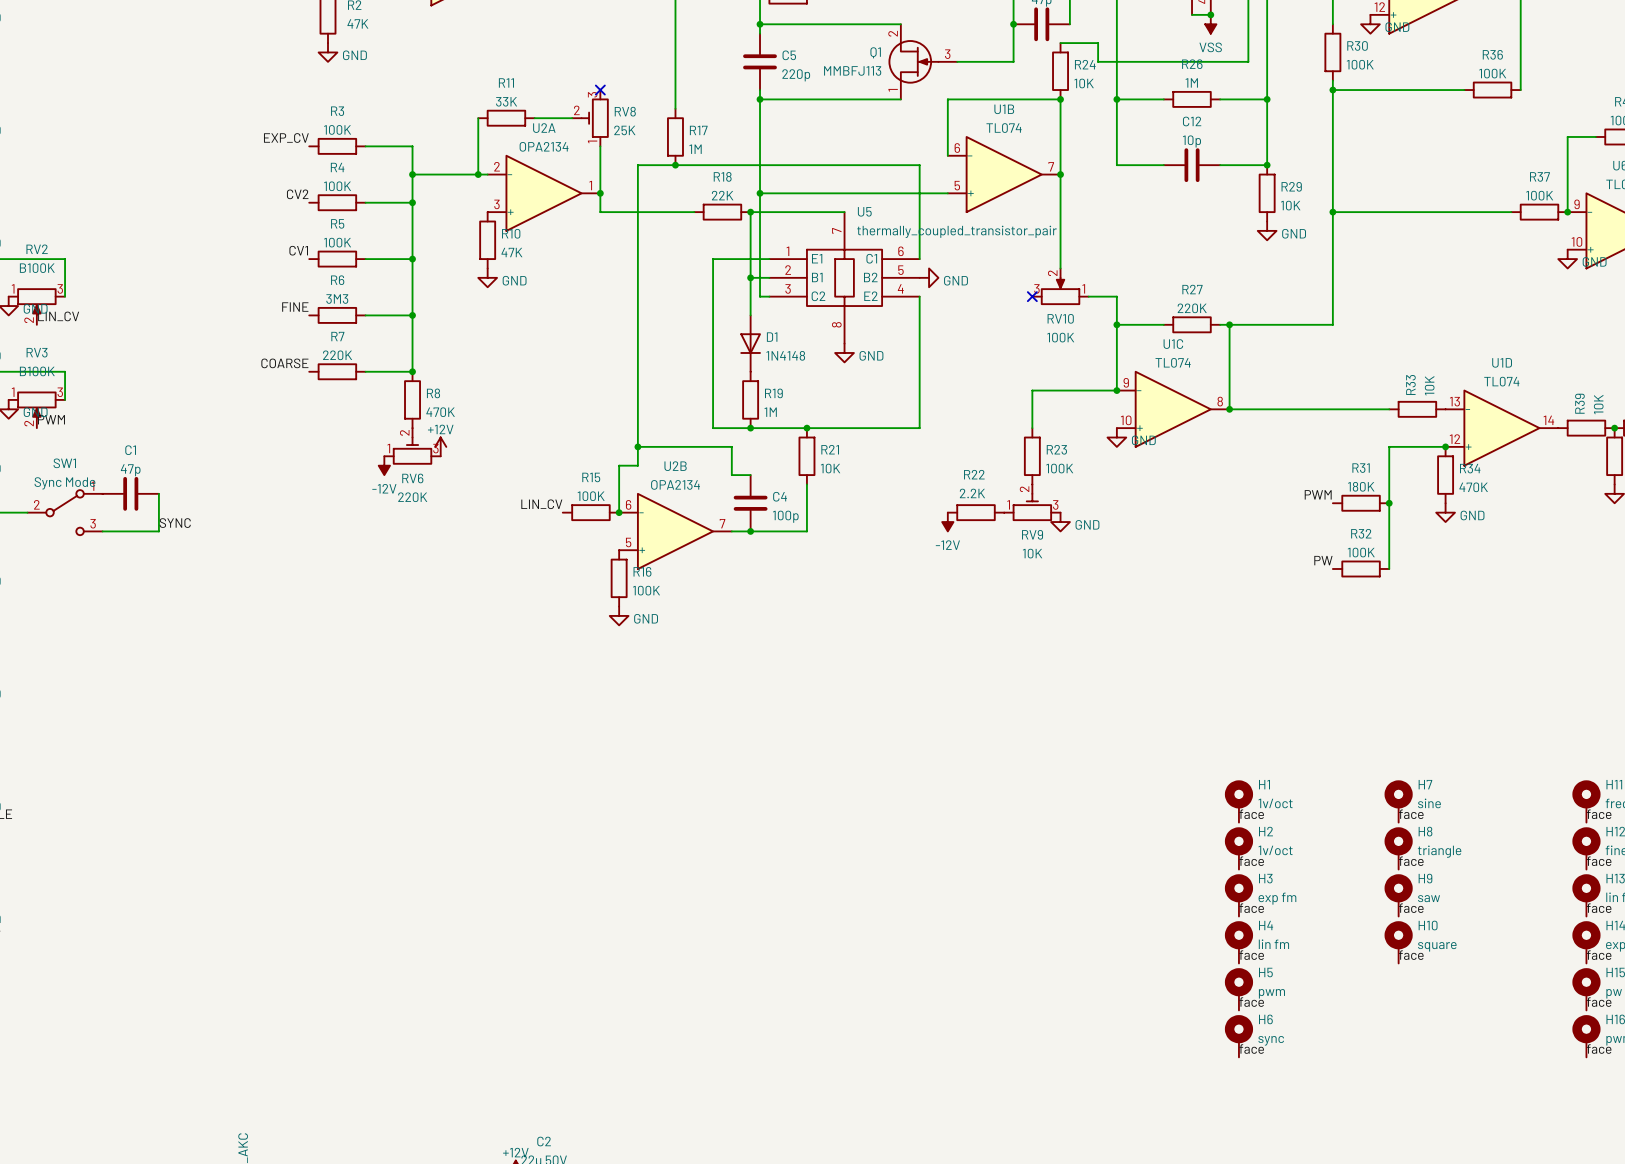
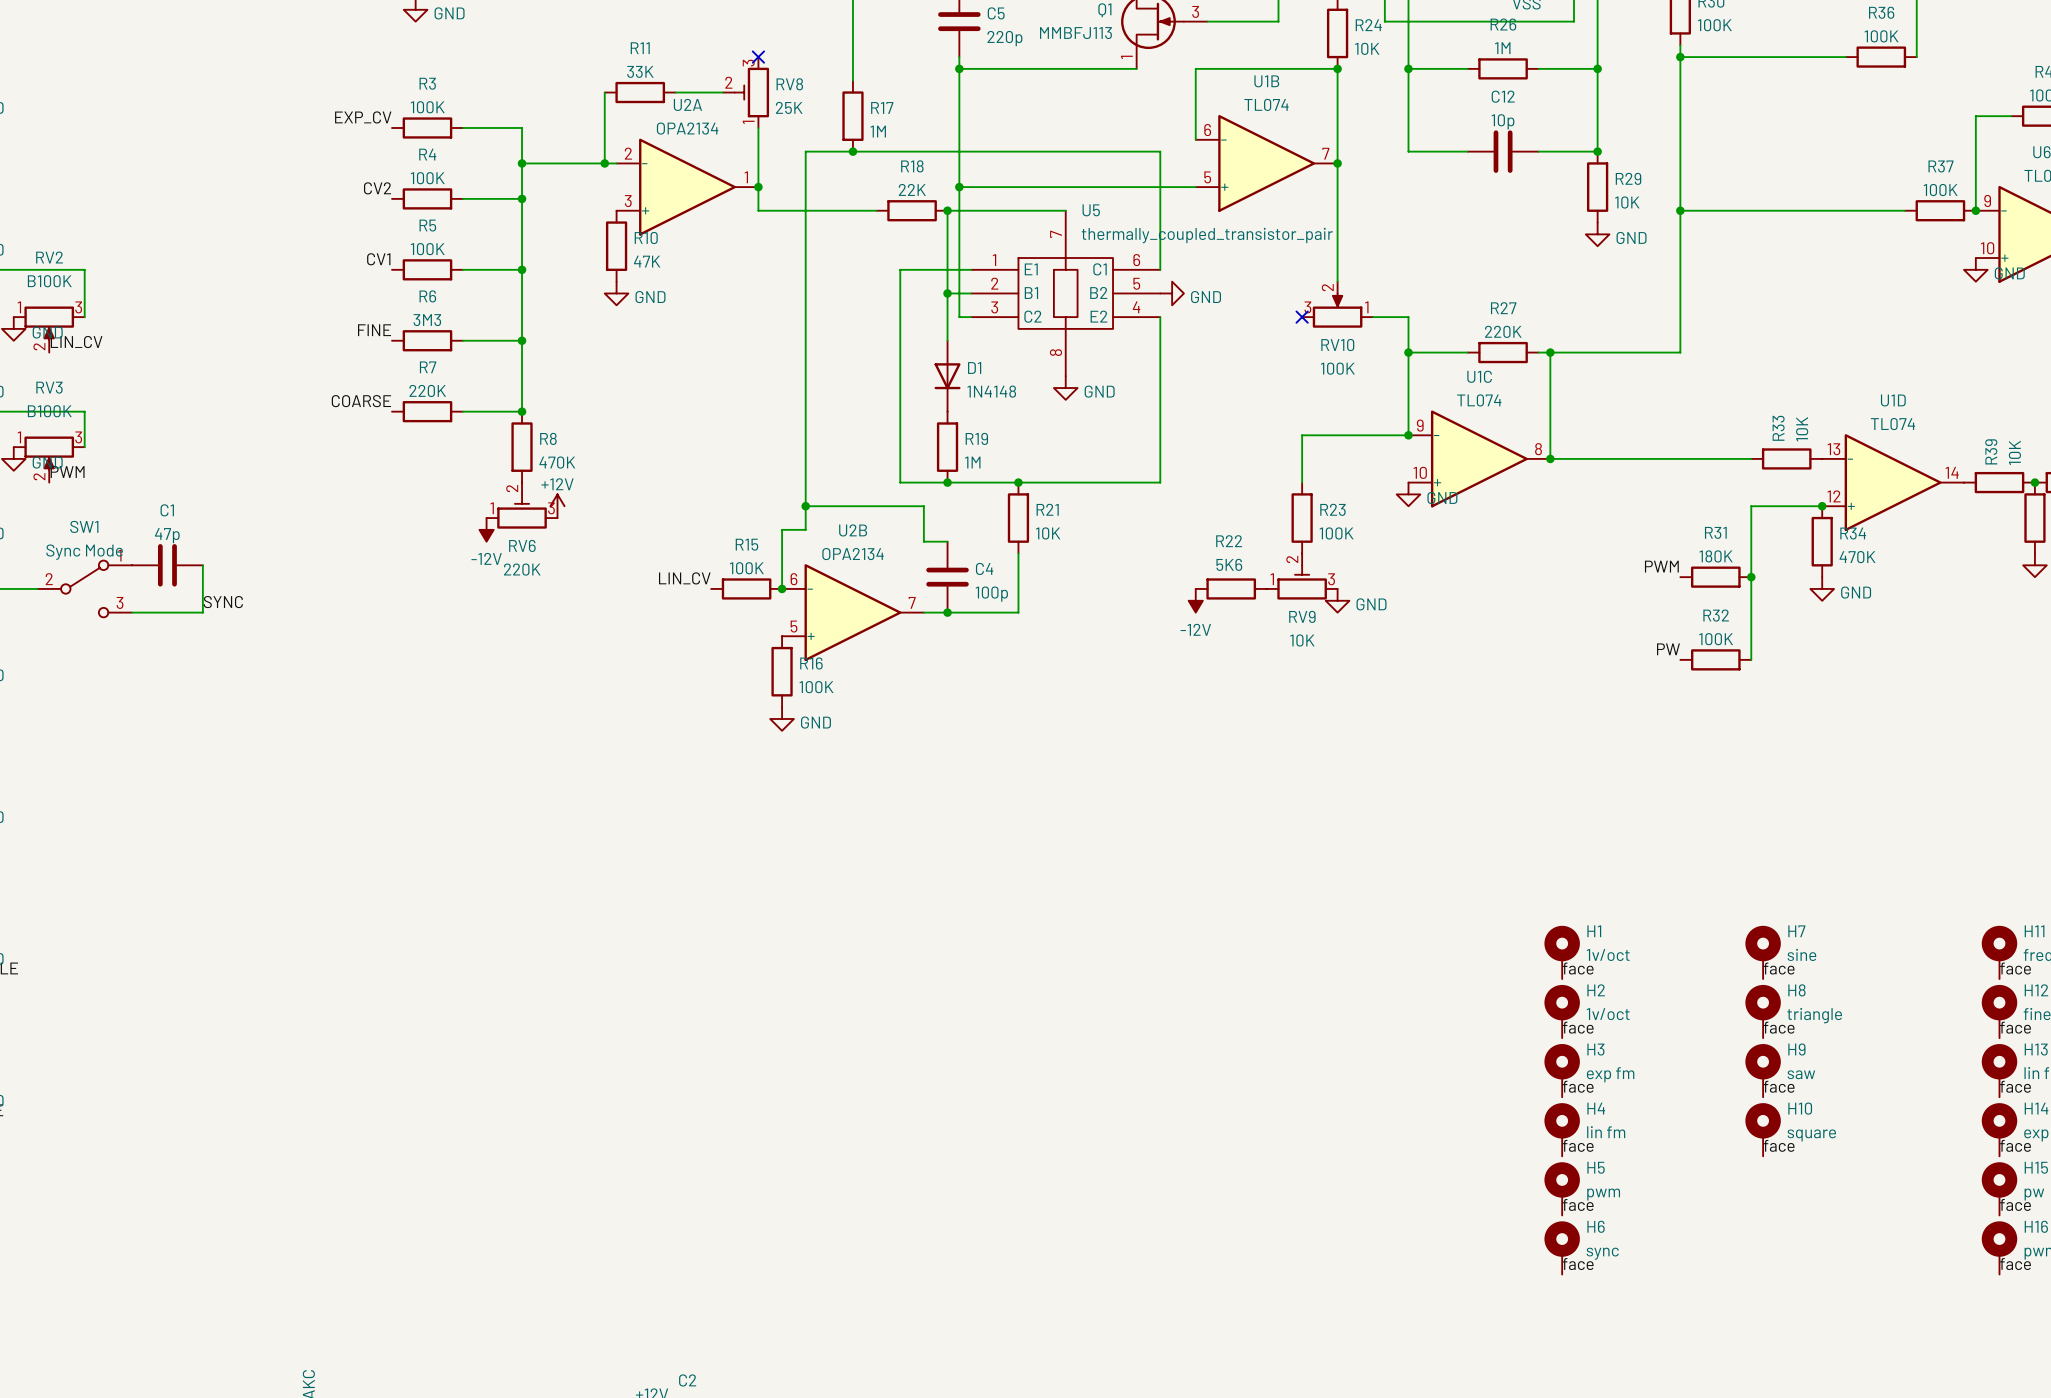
R22 value: 2.2K (972, 493) -> 5K6 (1229, 564)

